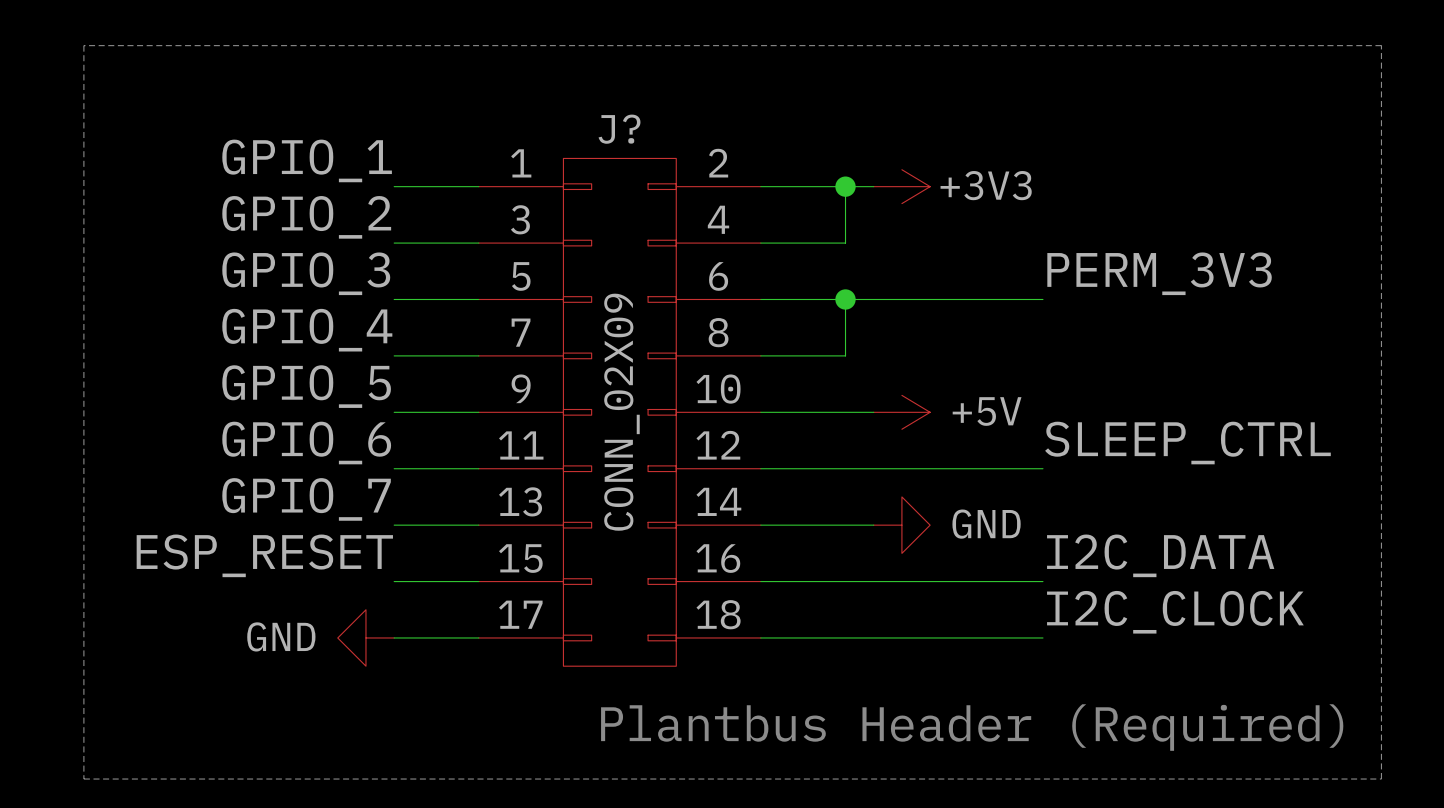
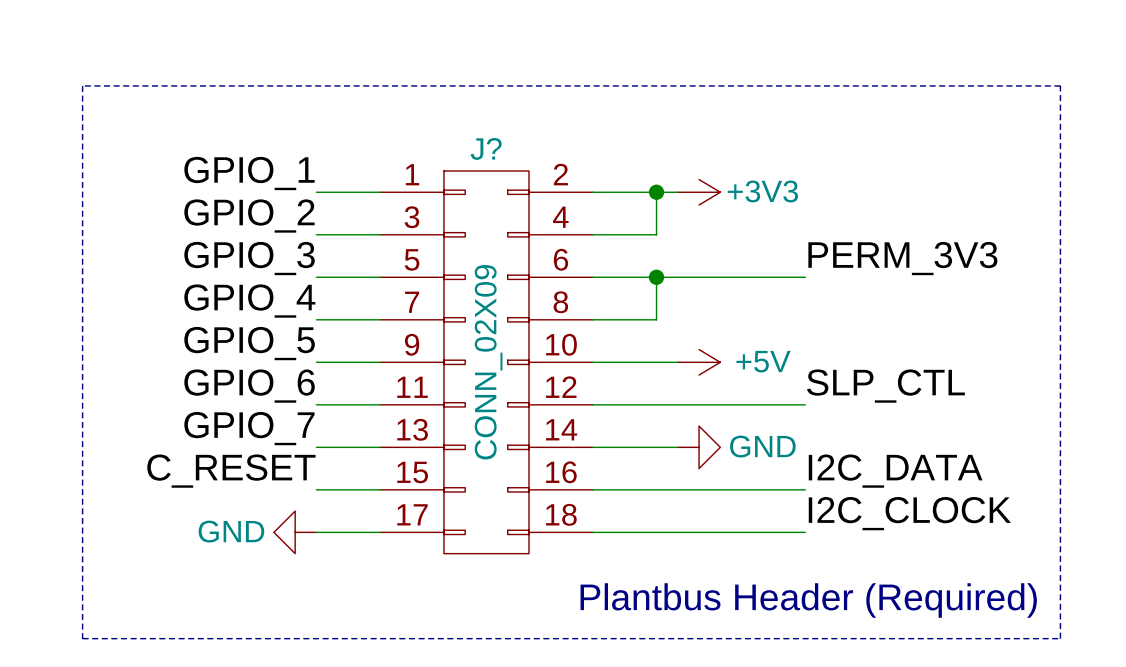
label: SLEEP_CTRL (1187, 443) -> SLP_CTL (885, 386)
label: ESP_RESET (264, 555) -> C_RESET (231, 471)

